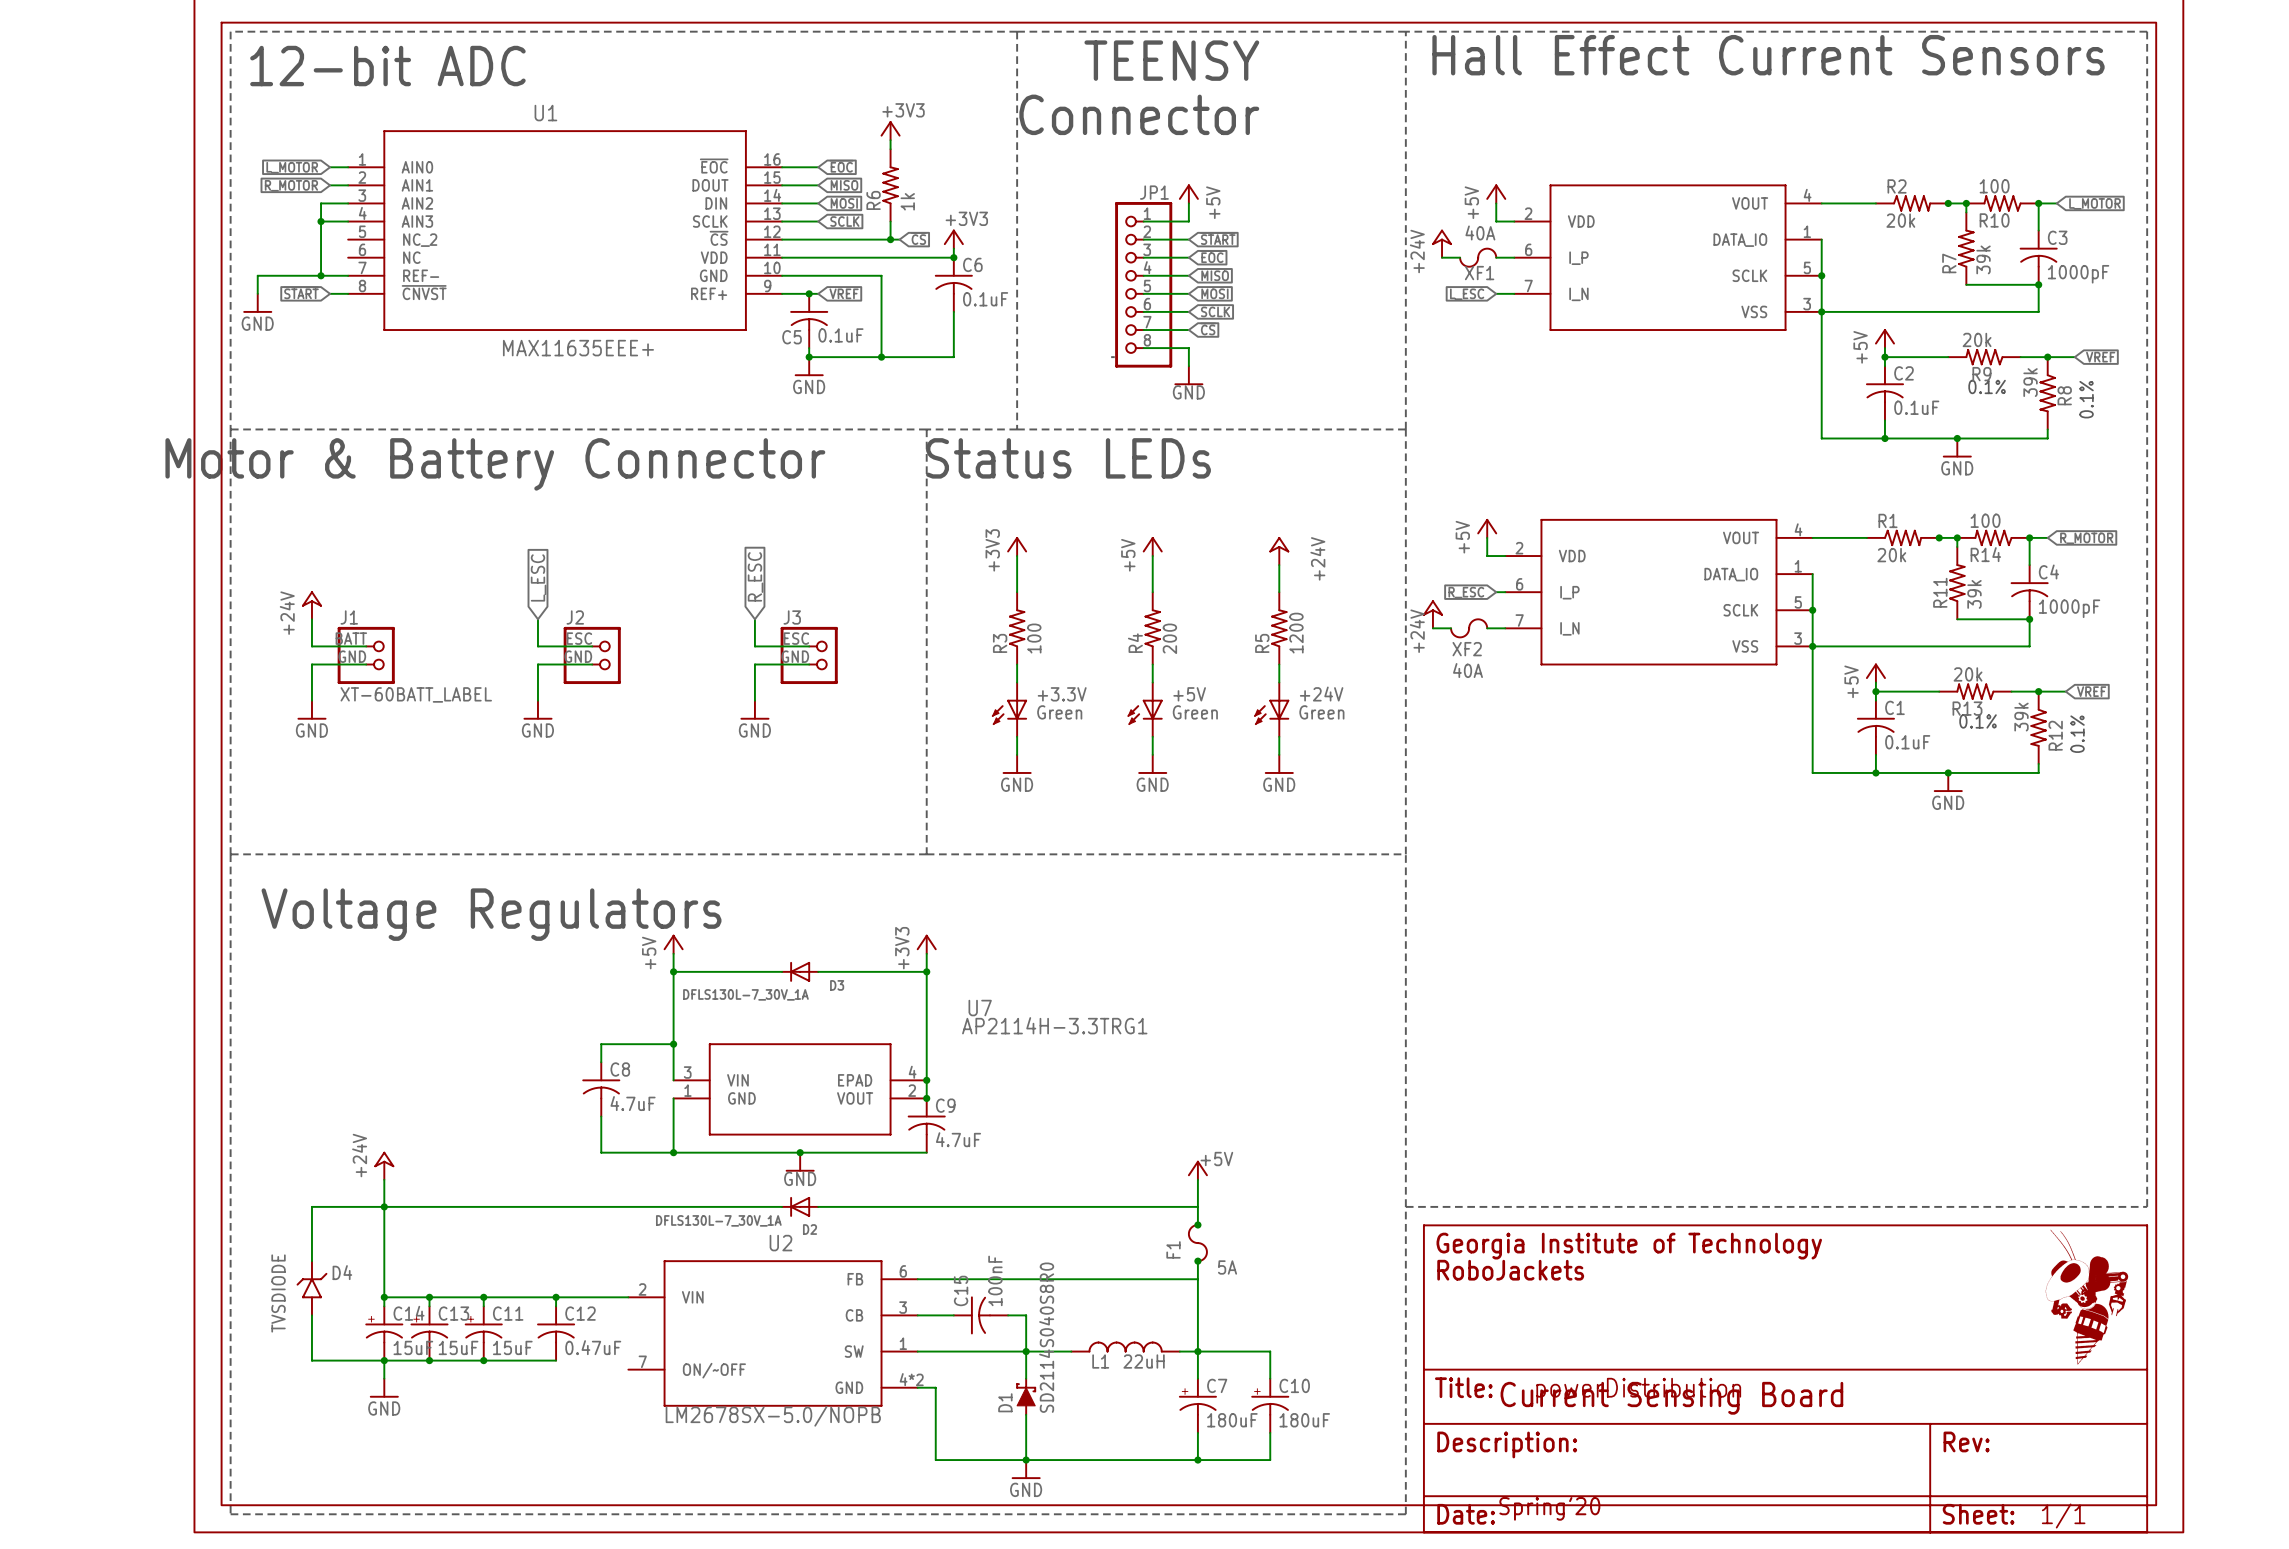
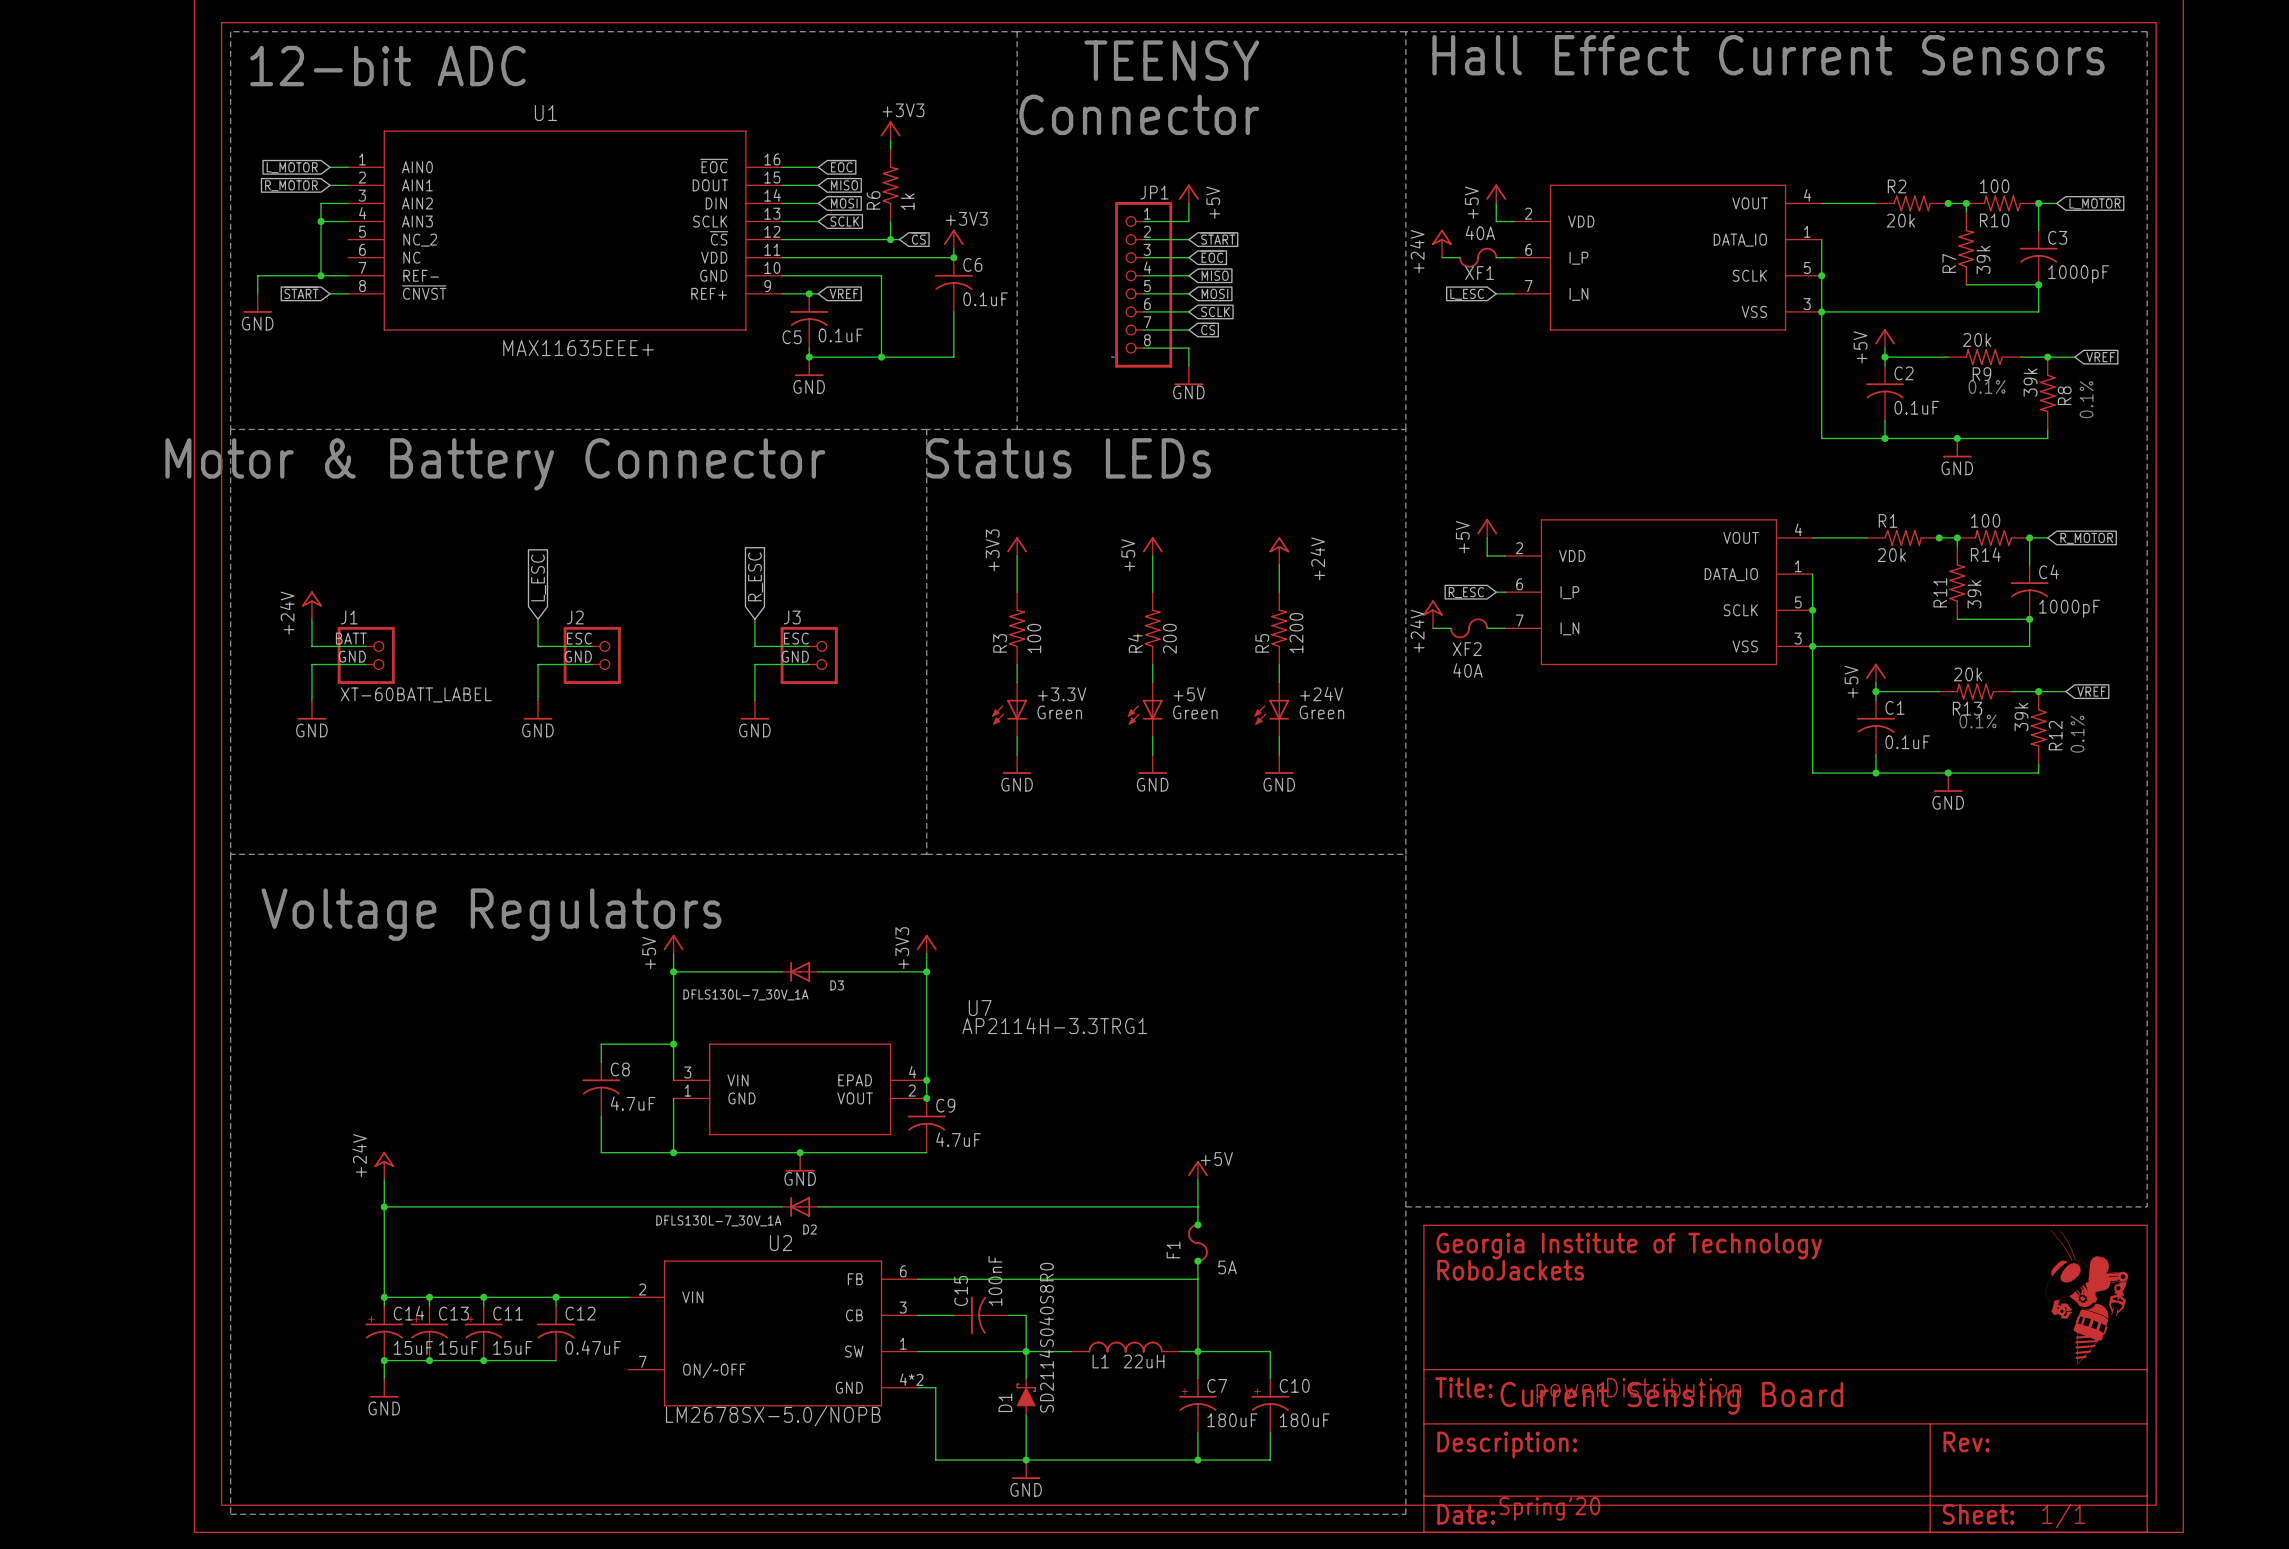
wire: (384, 1206) (311, 1206) (311, 1261) -> none
D4: TVSDIODE (311, 1288) -> none
wire: (311, 1315) (311, 1360) (384, 1360) -> none

